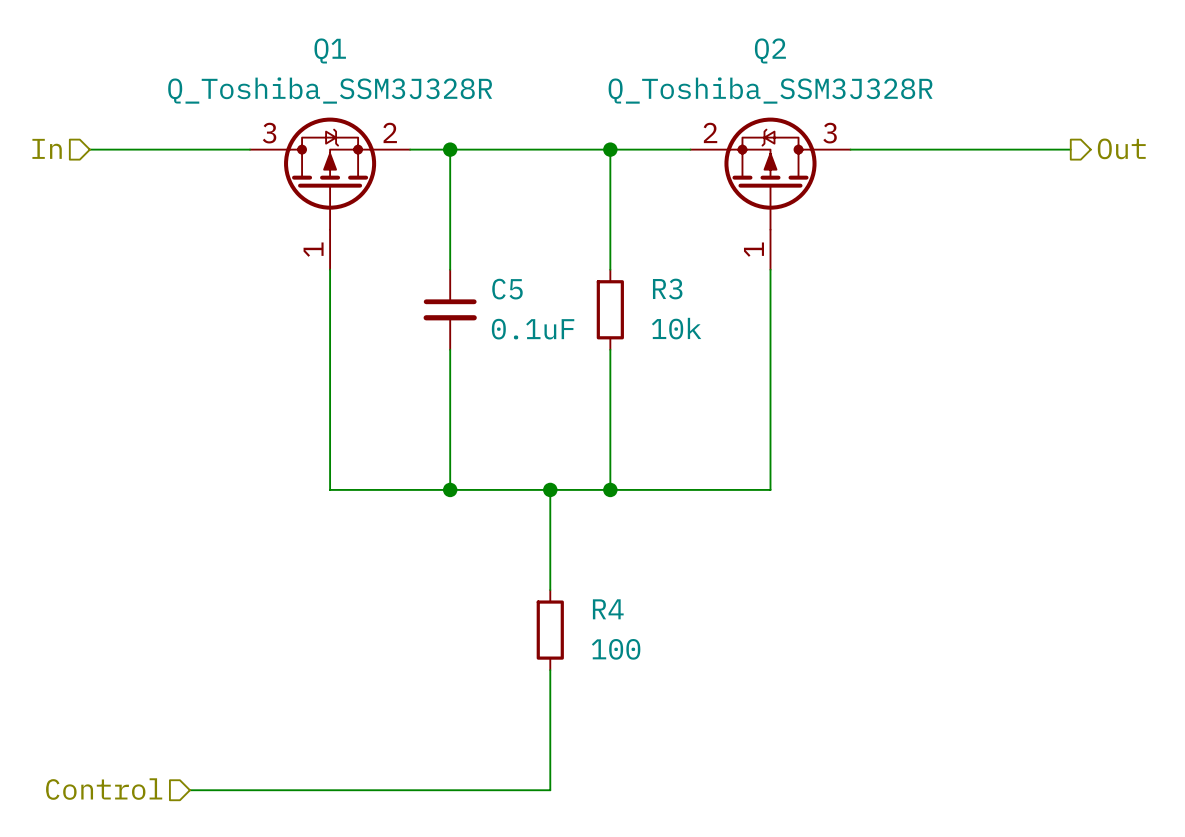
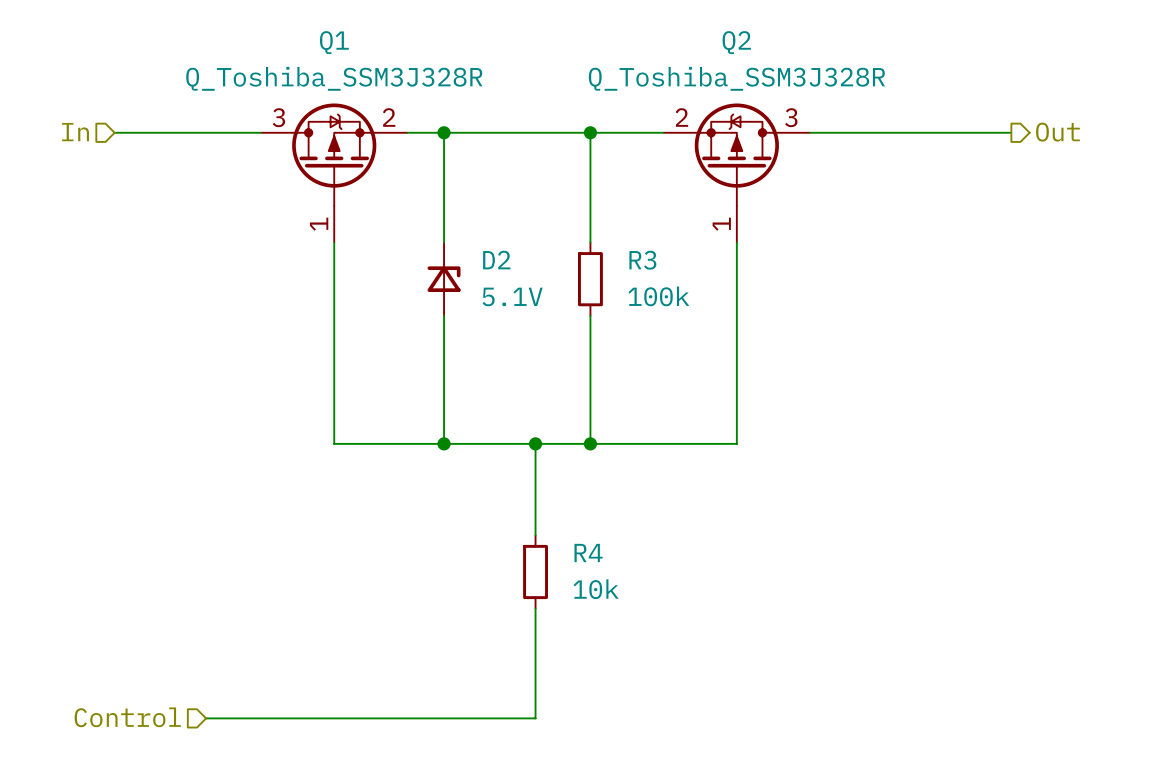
C5: 0.1uF (450, 309) -> none
D2: none -> 5.1V (444, 279)
R3 value: 10k (676, 328) -> 100k (658, 296)
R4 value: 100 (616, 649) -> 10k (596, 589)

